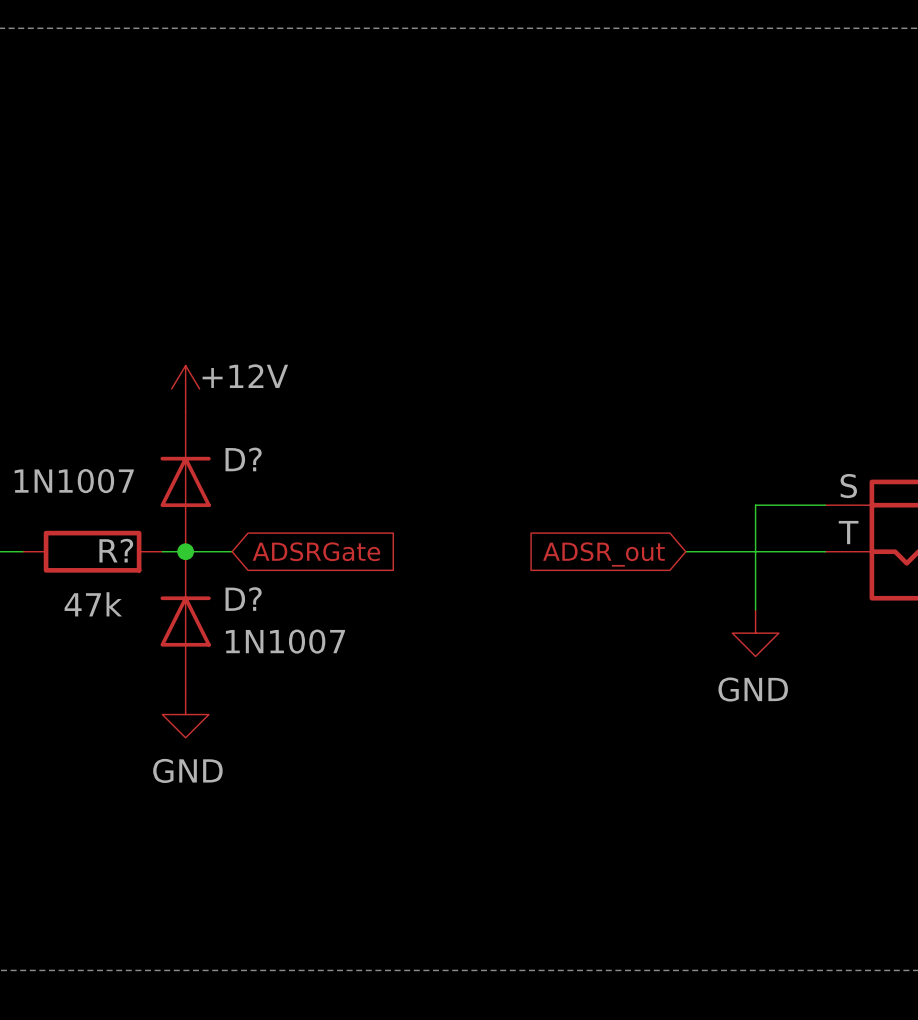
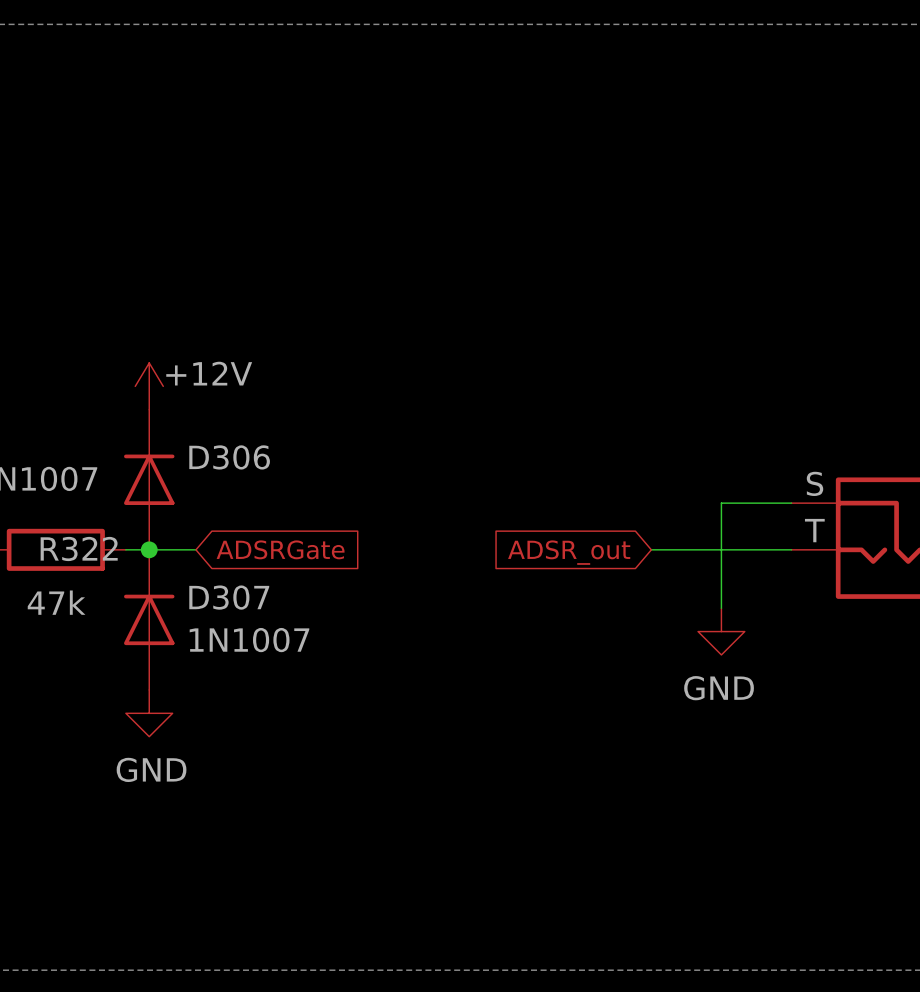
D? name: D? (243, 459) -> D306 (229, 457)
R? name: R? (116, 550) -> R322 (79, 548)
D? name: D? (243, 599) -> D307 (229, 597)

